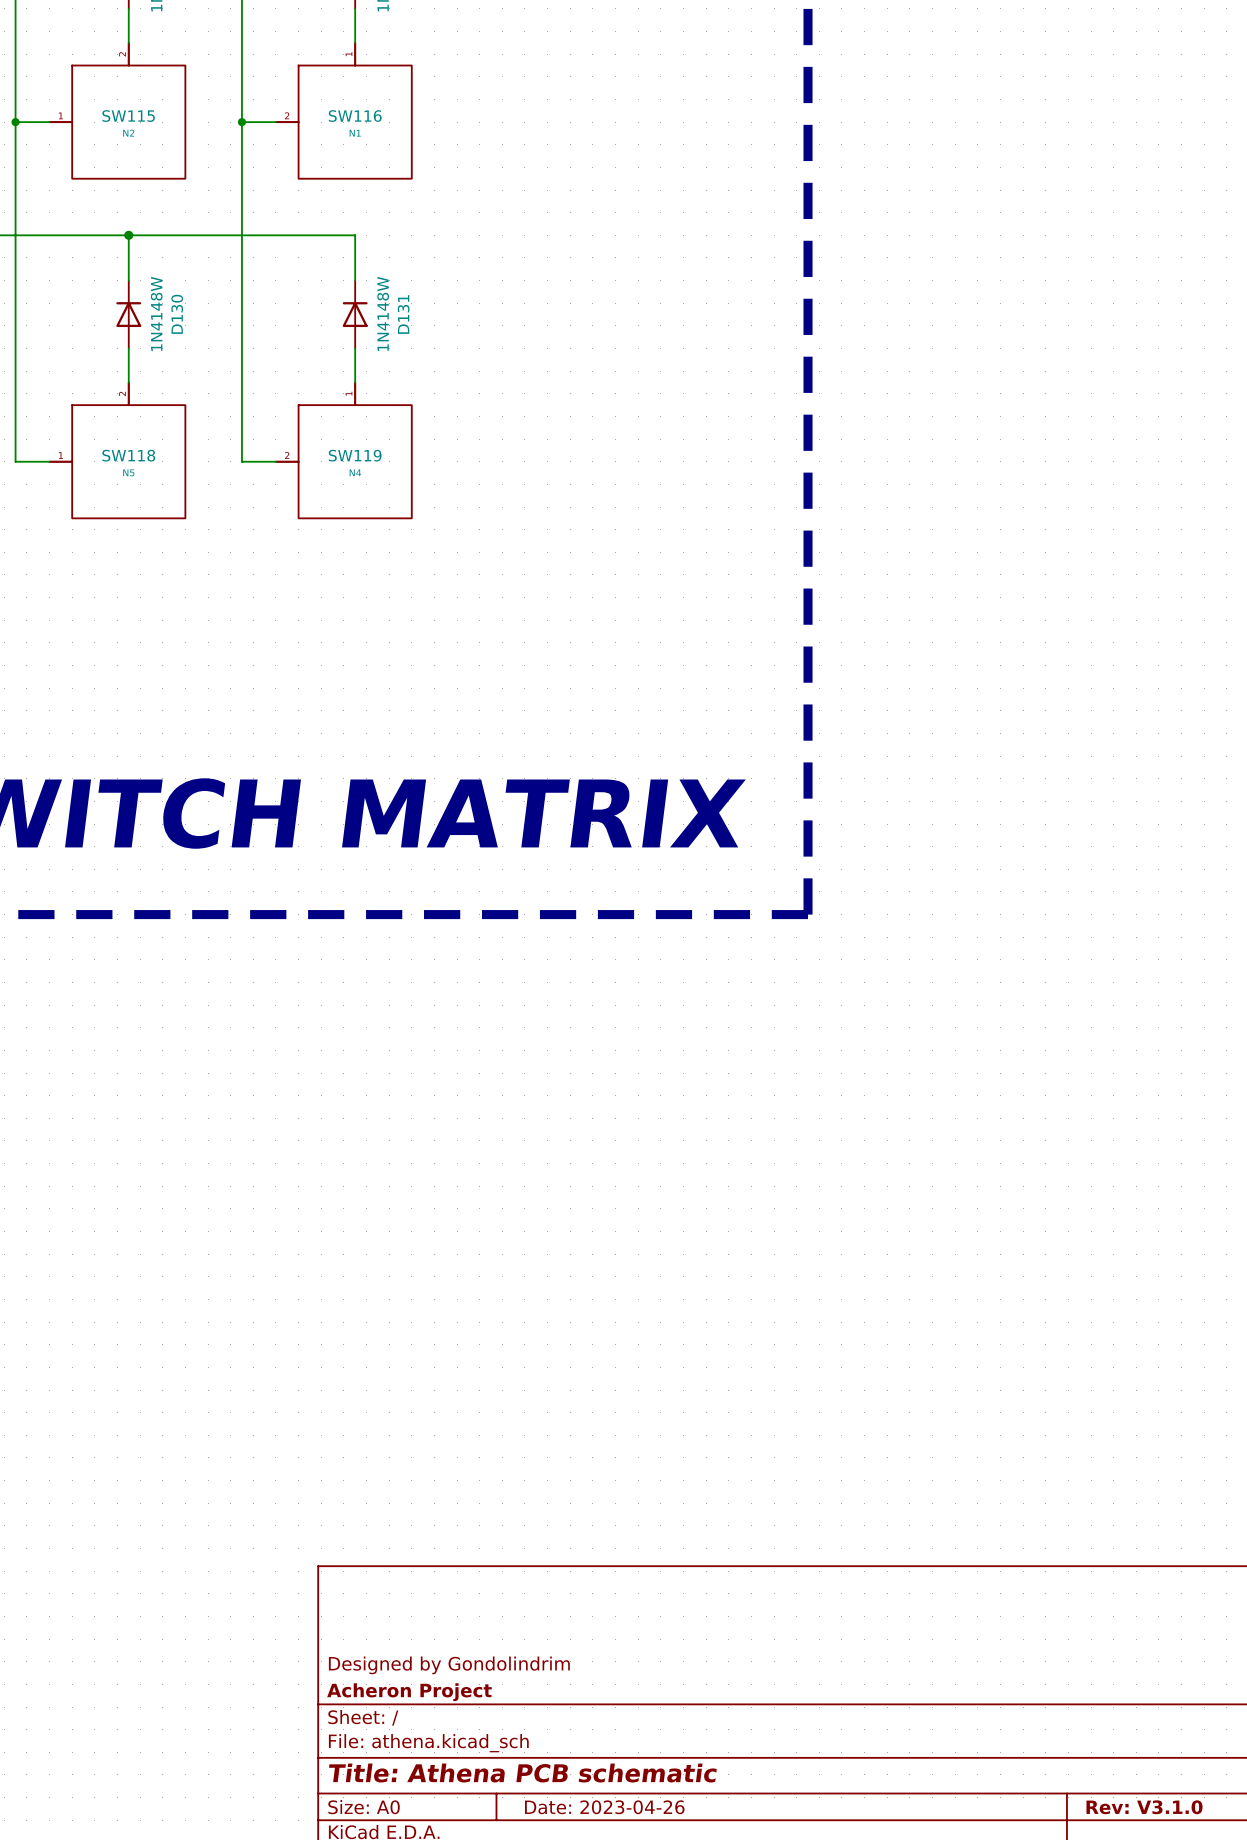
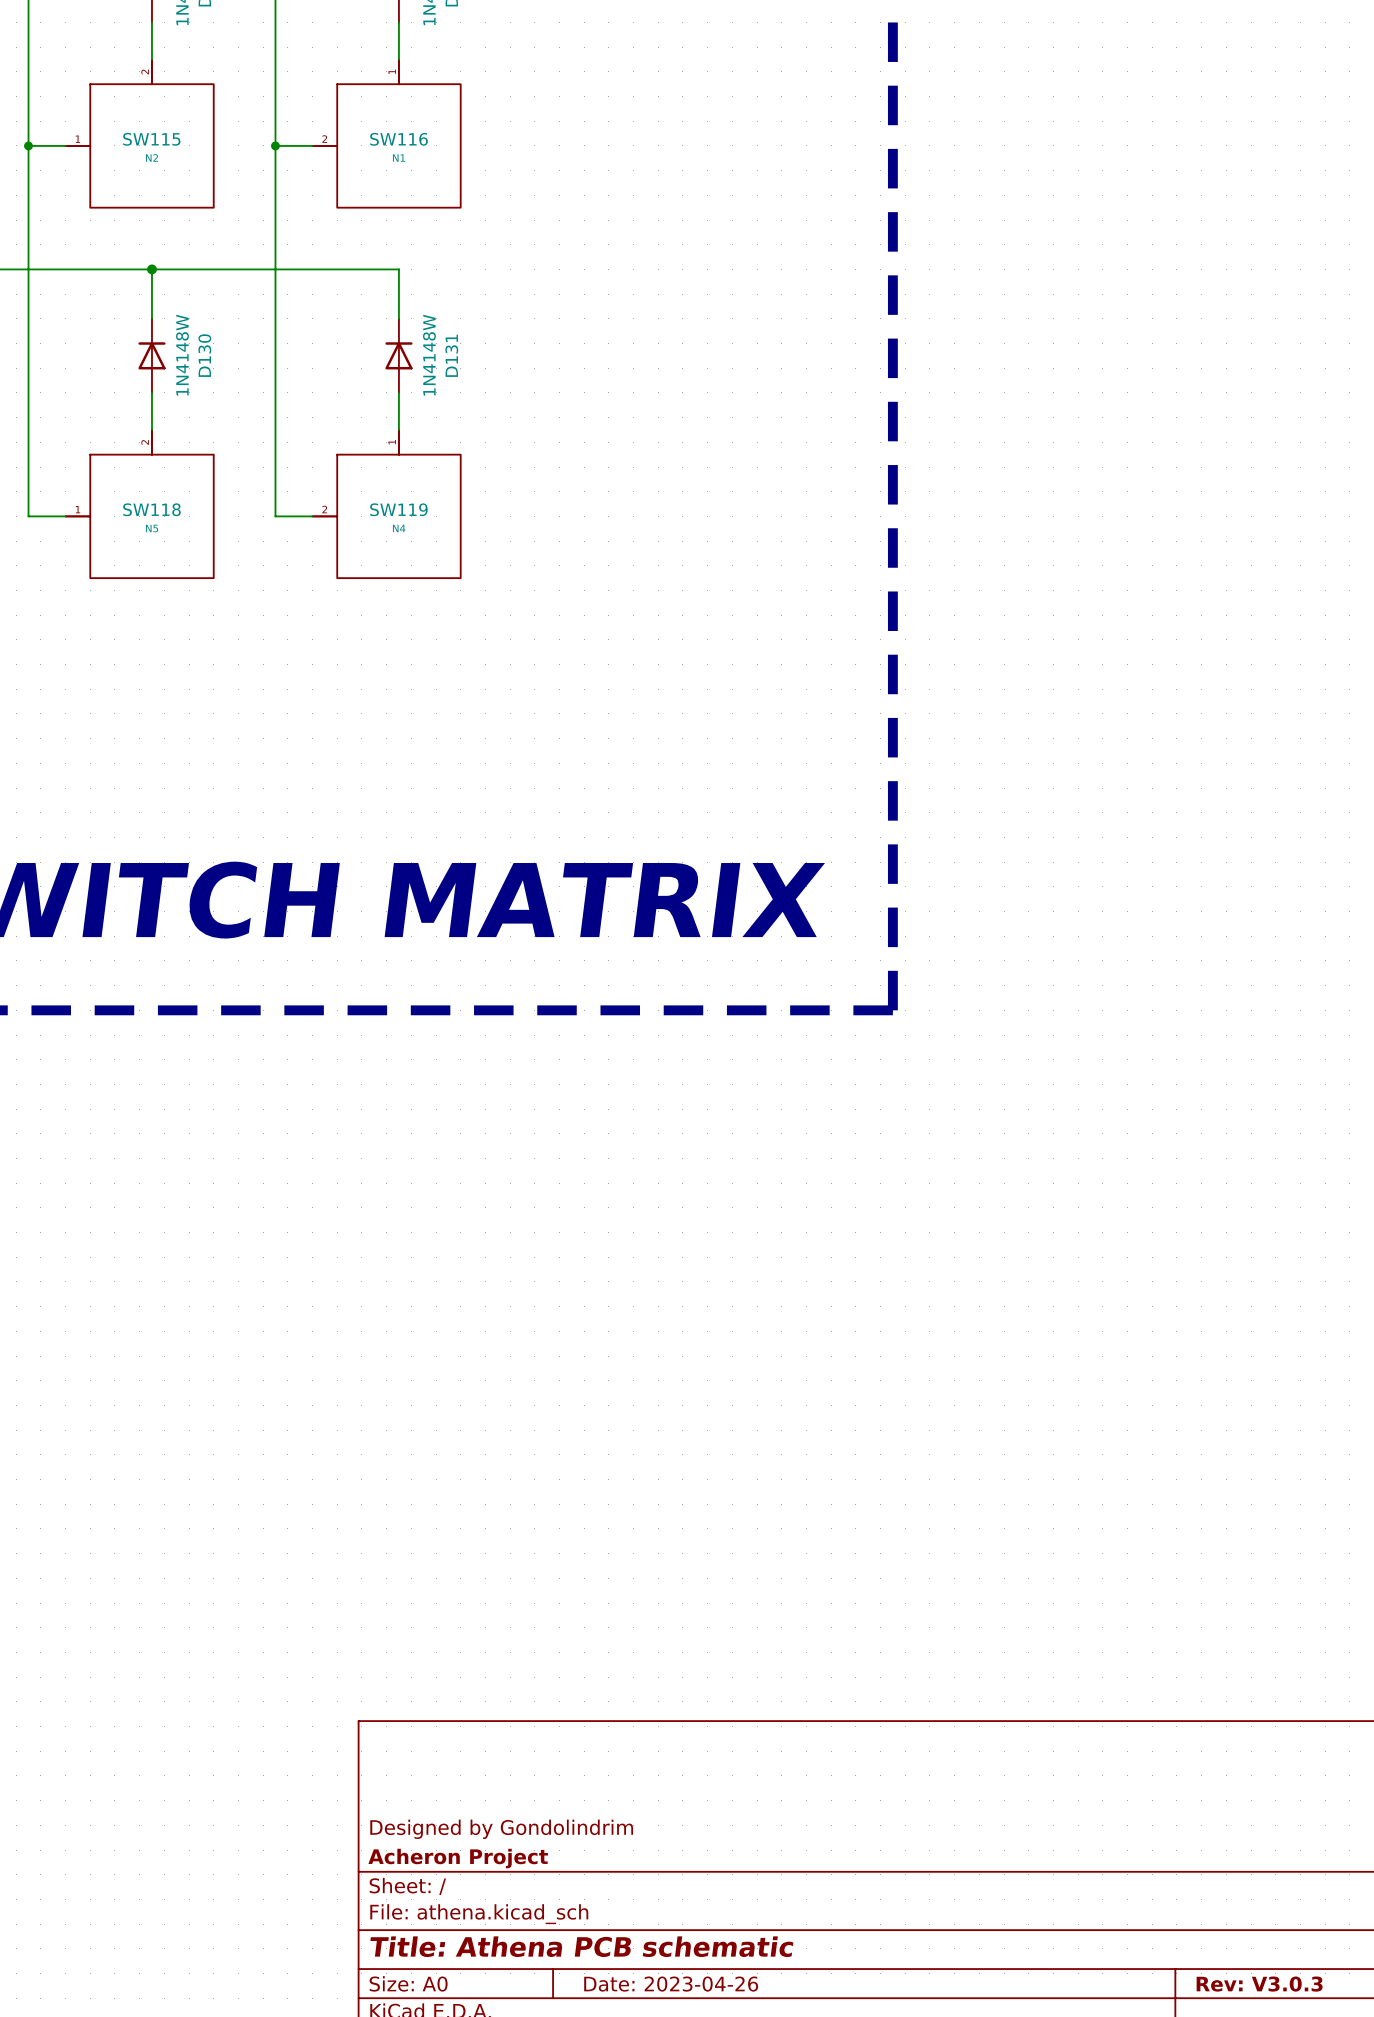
title block: Rev: V3.1.0 (1144, 1807) -> Rev: V3.0.3 (1259, 1984)

